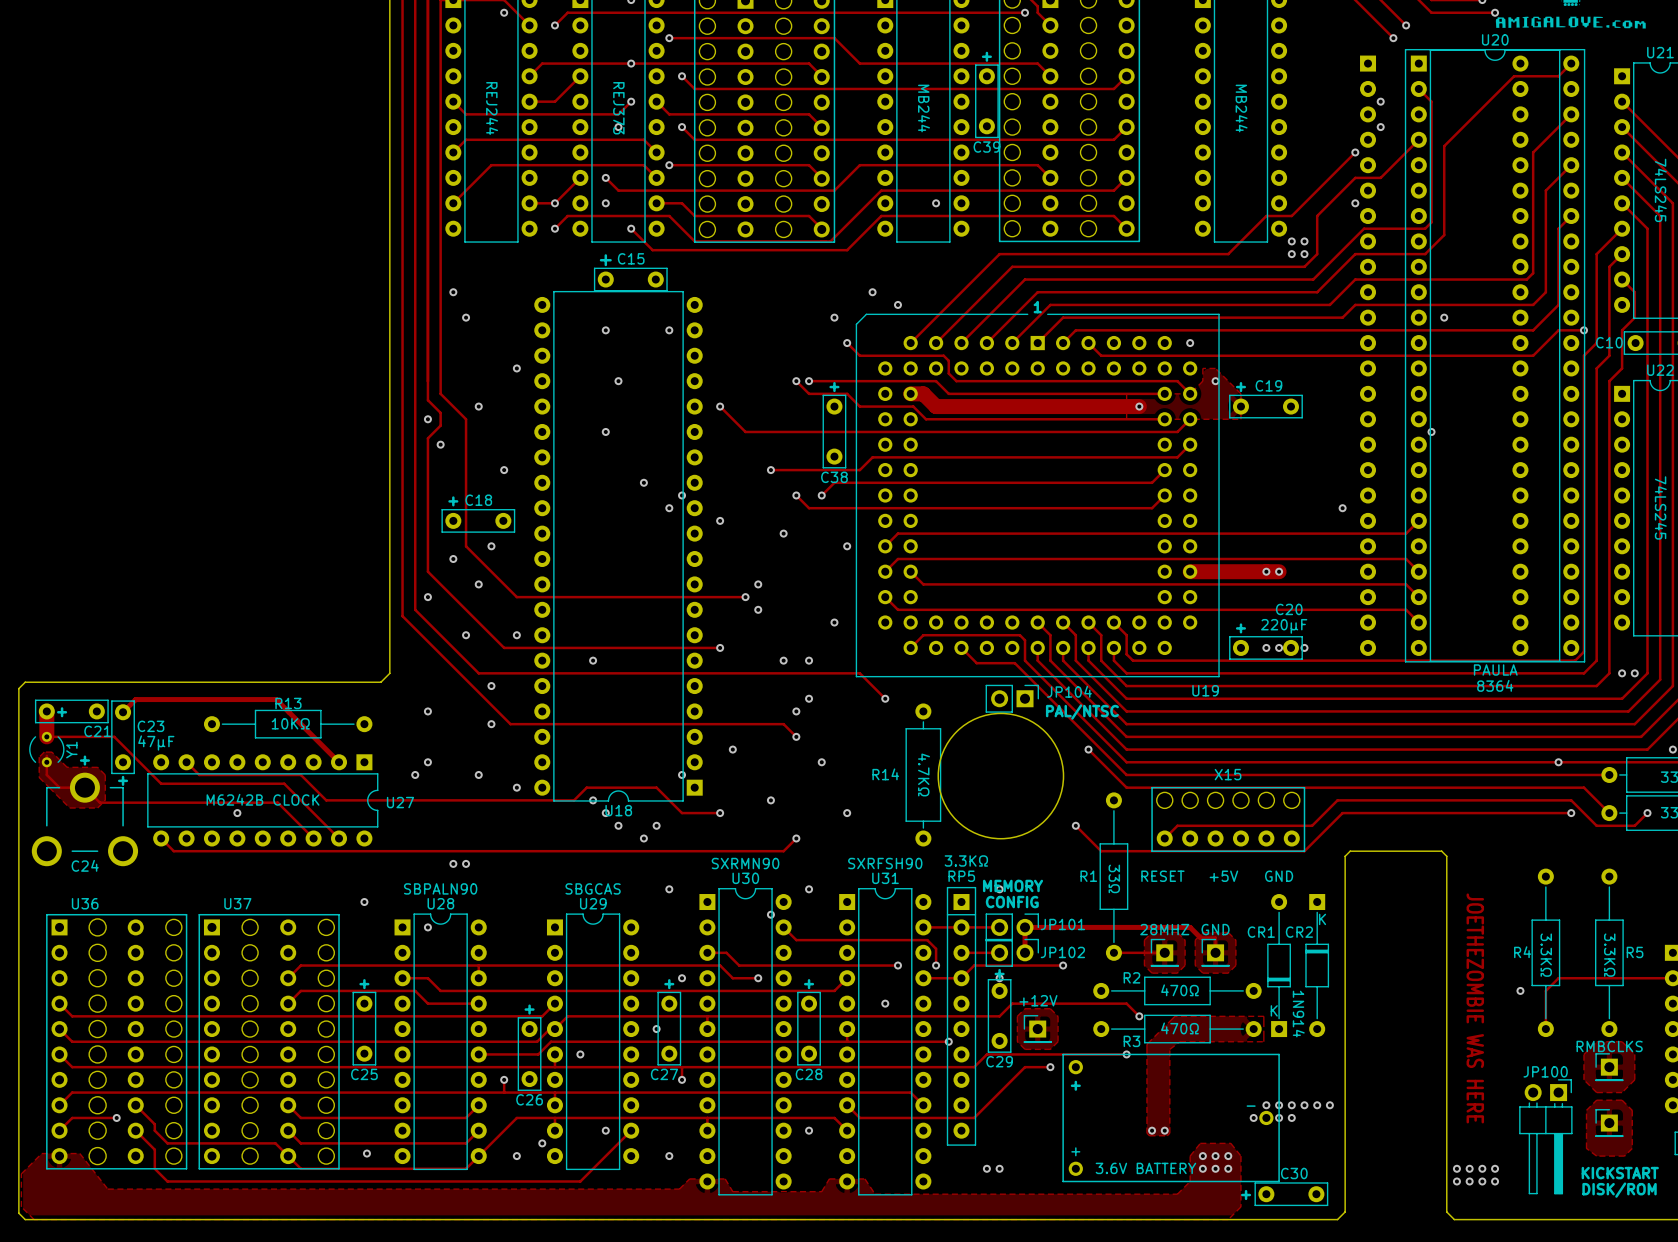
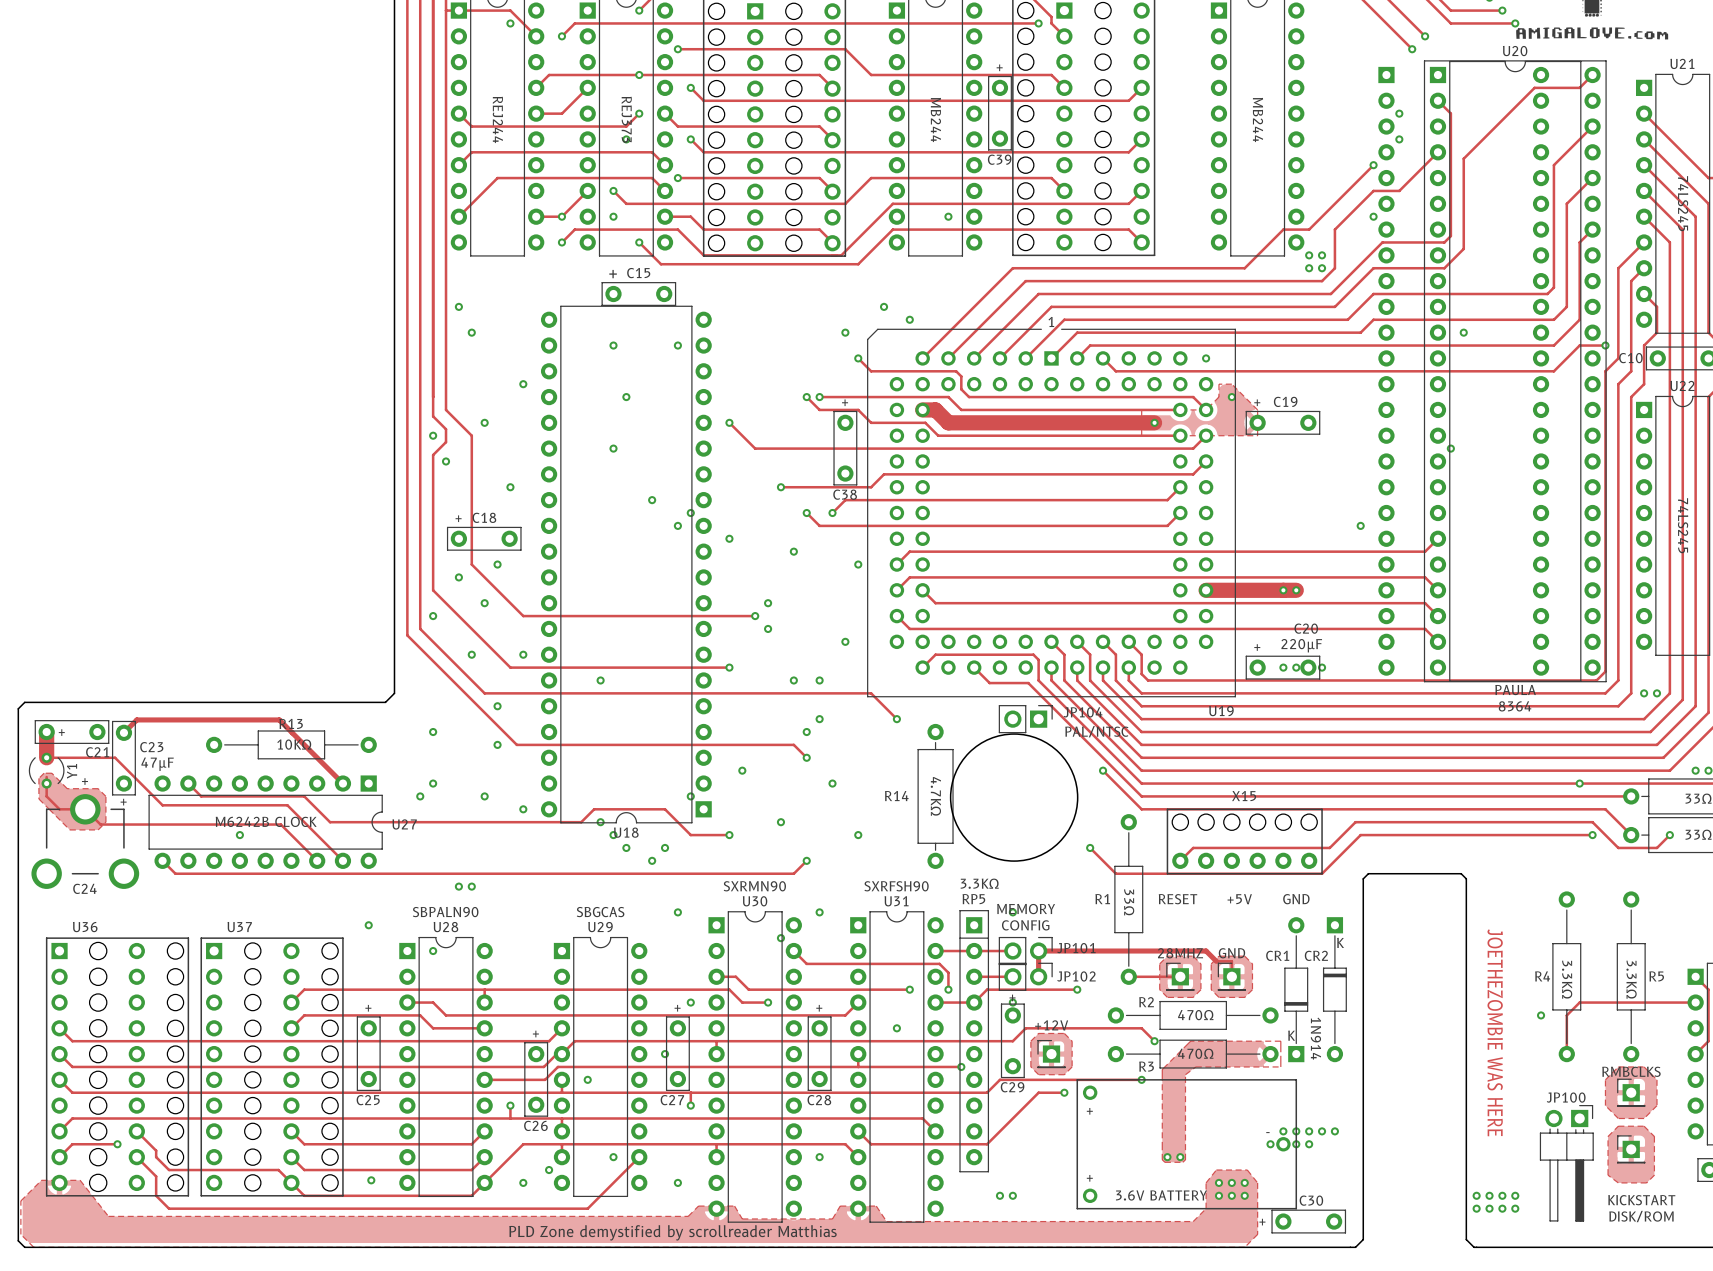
via: (1329, 1105) -> none
text: none -> PLD Zone demystified by scrollreader Matthias (672, 1232)

